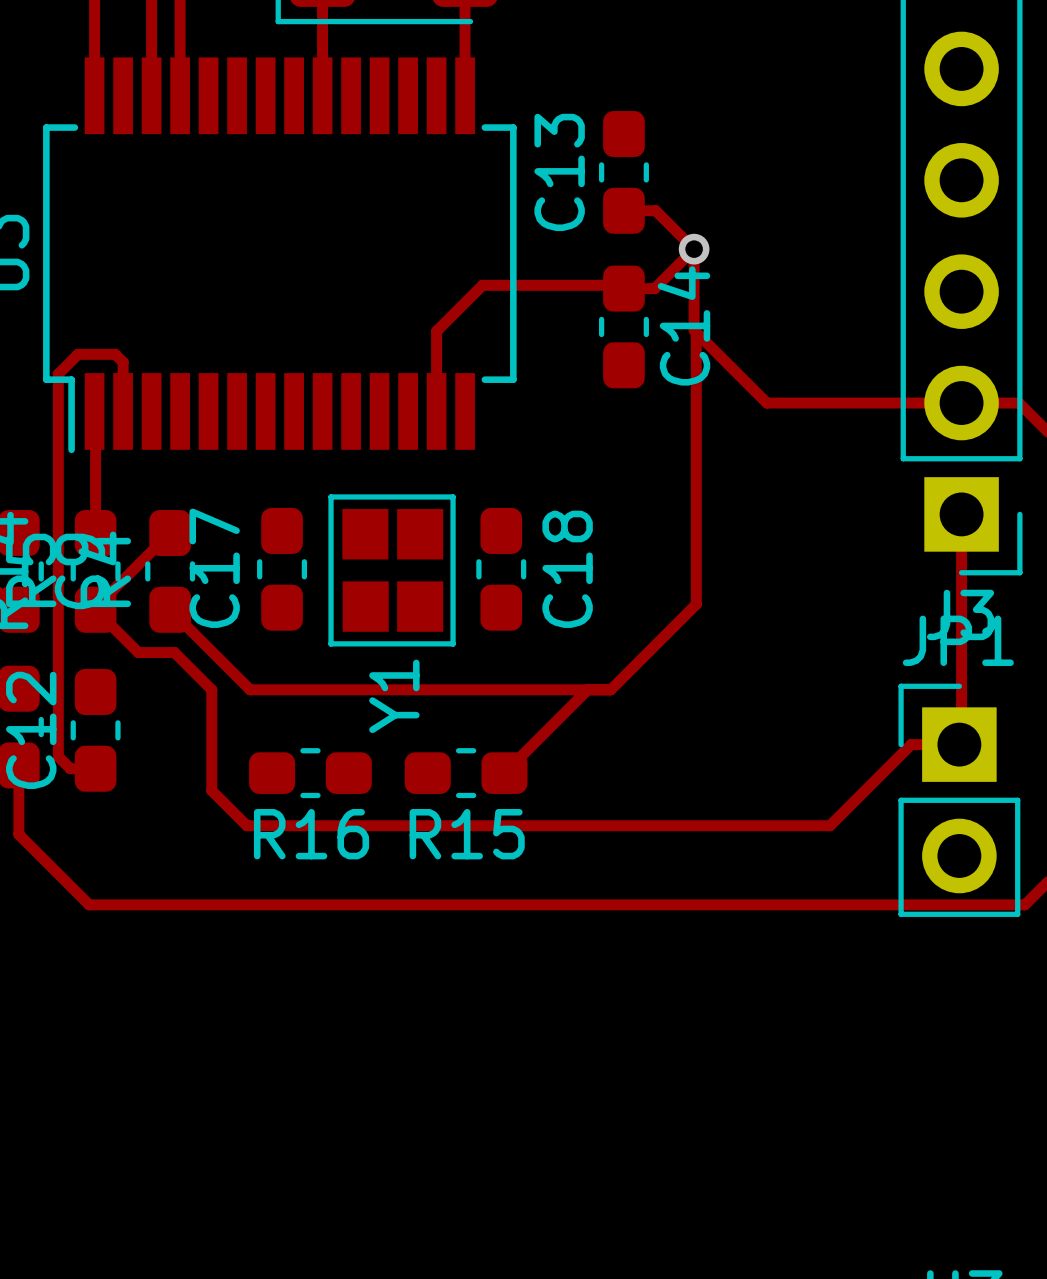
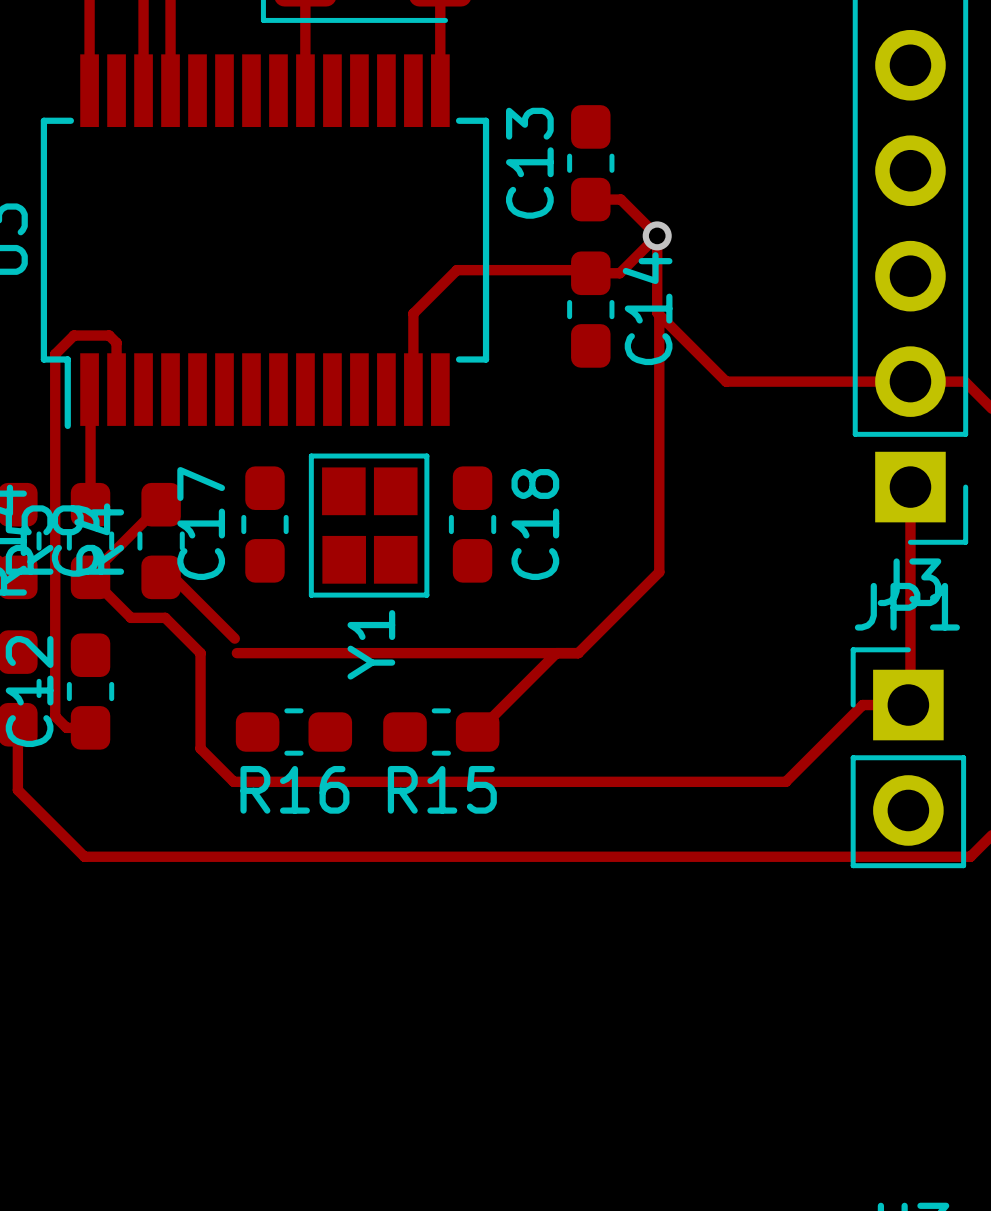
C17 position: (282, 569) -> (264, 524)
C18 position: (501, 569) -> (472, 524)
Y1 position: (392, 570) -> (369, 525)
track: (170, 609) (250, 689) -> (159, 562) (234, 638)

